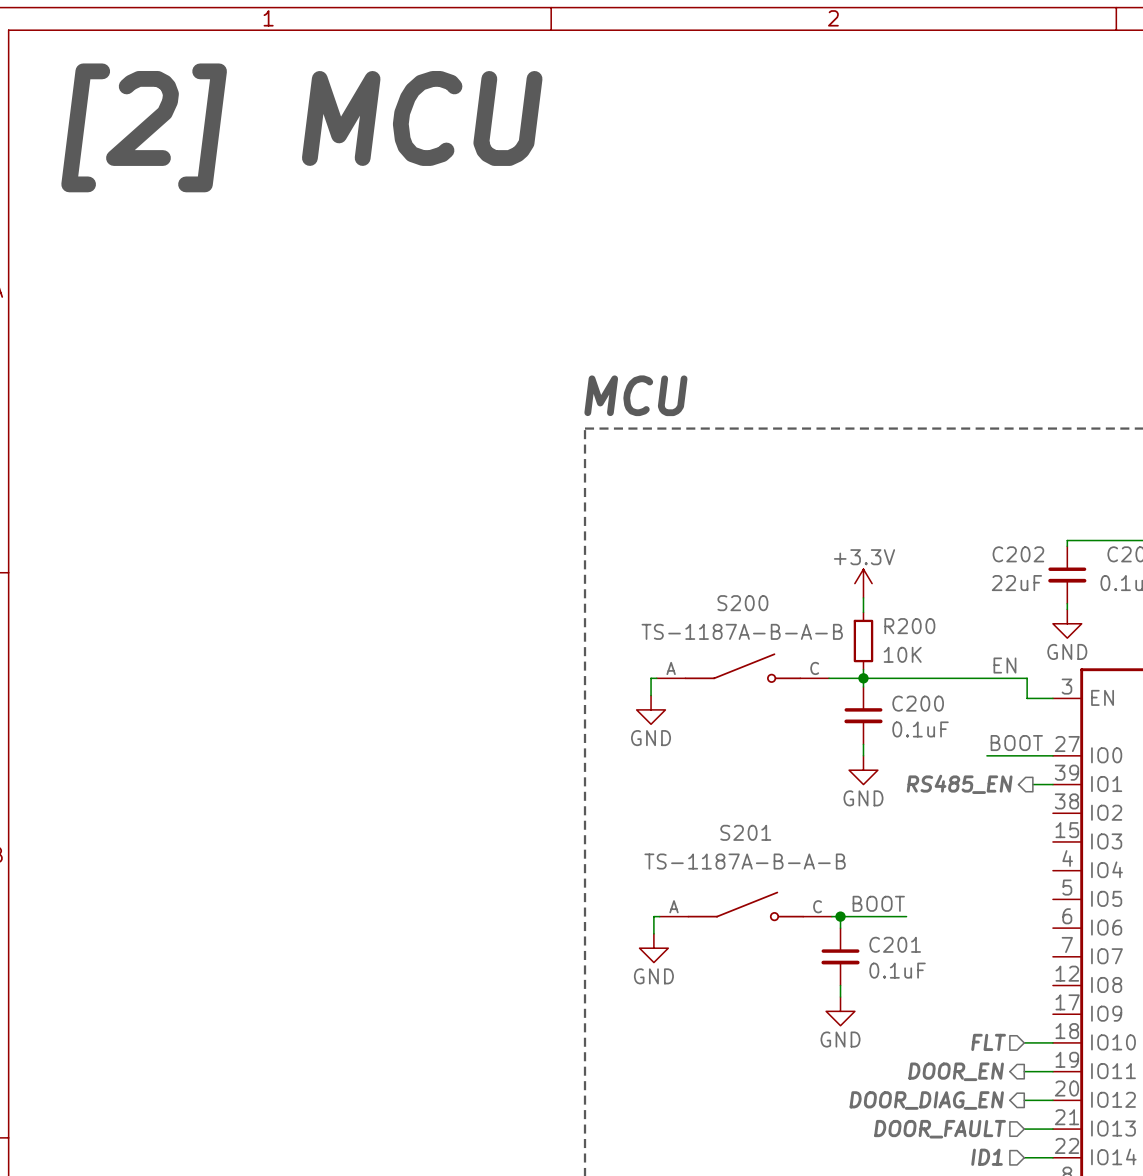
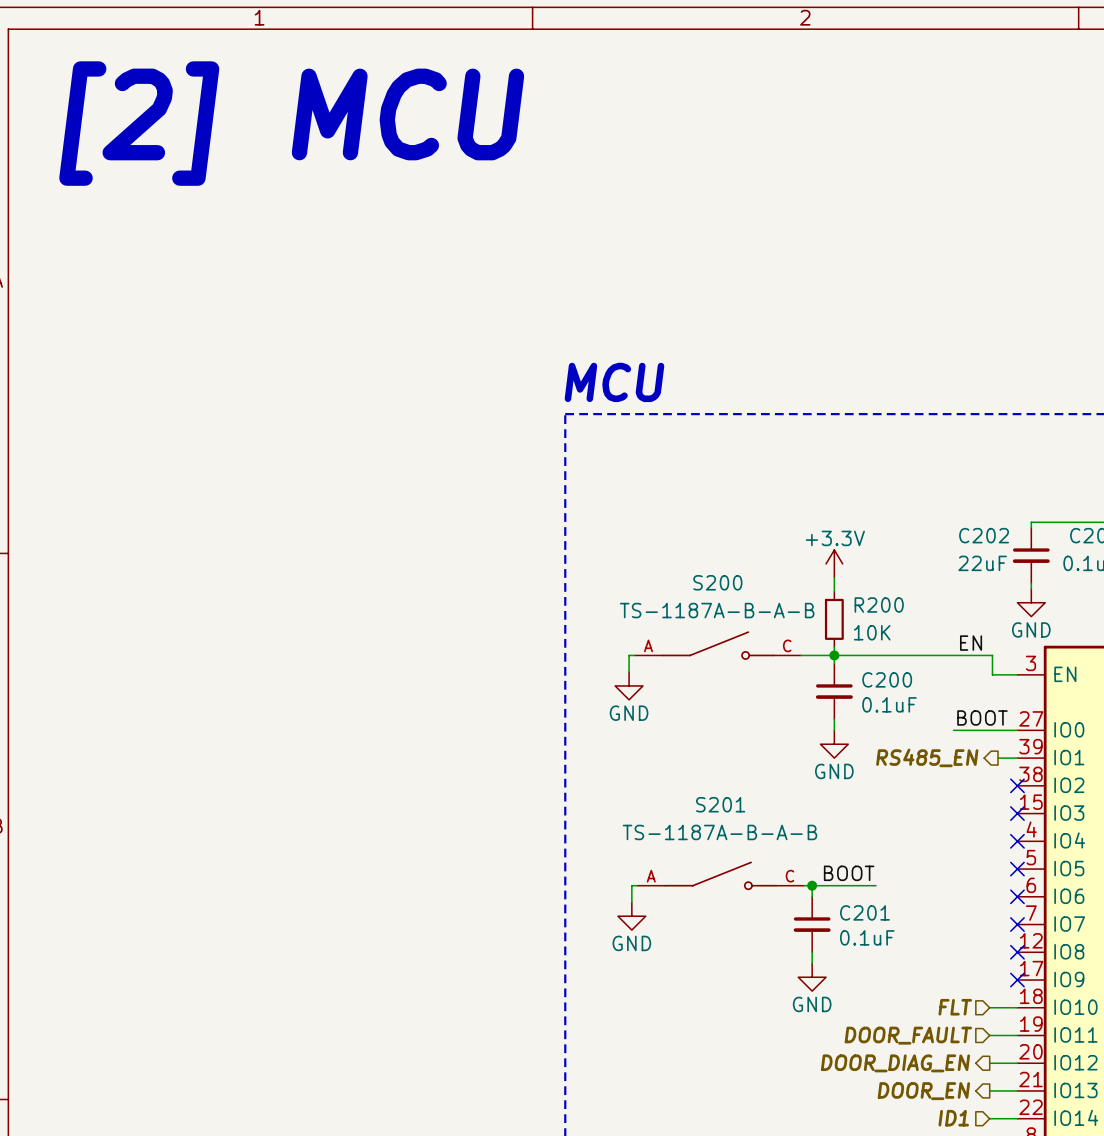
no-connect mark: none -> (1017, 785)
no-connect mark: none -> (1017, 813)
no-connect mark: none -> (1017, 841)
no-connect mark: none -> (1017, 869)
no-connect mark: none -> (1017, 896)
no-connect mark: none -> (1017, 924)
no-connect mark: none -> (1017, 952)
no-connect mark: none -> (1017, 980)
hierarchical label shape: output (956, 1071) -> input (908, 1035)
hierarchical label: DOOR_EN (956, 1071) -> DOOR_FAULT (908, 1035)
hierarchical label shape: input (940, 1129) -> output (923, 1091)
hierarchical label: DOOR_FAULT (940, 1129) -> DOOR_EN (923, 1091)

